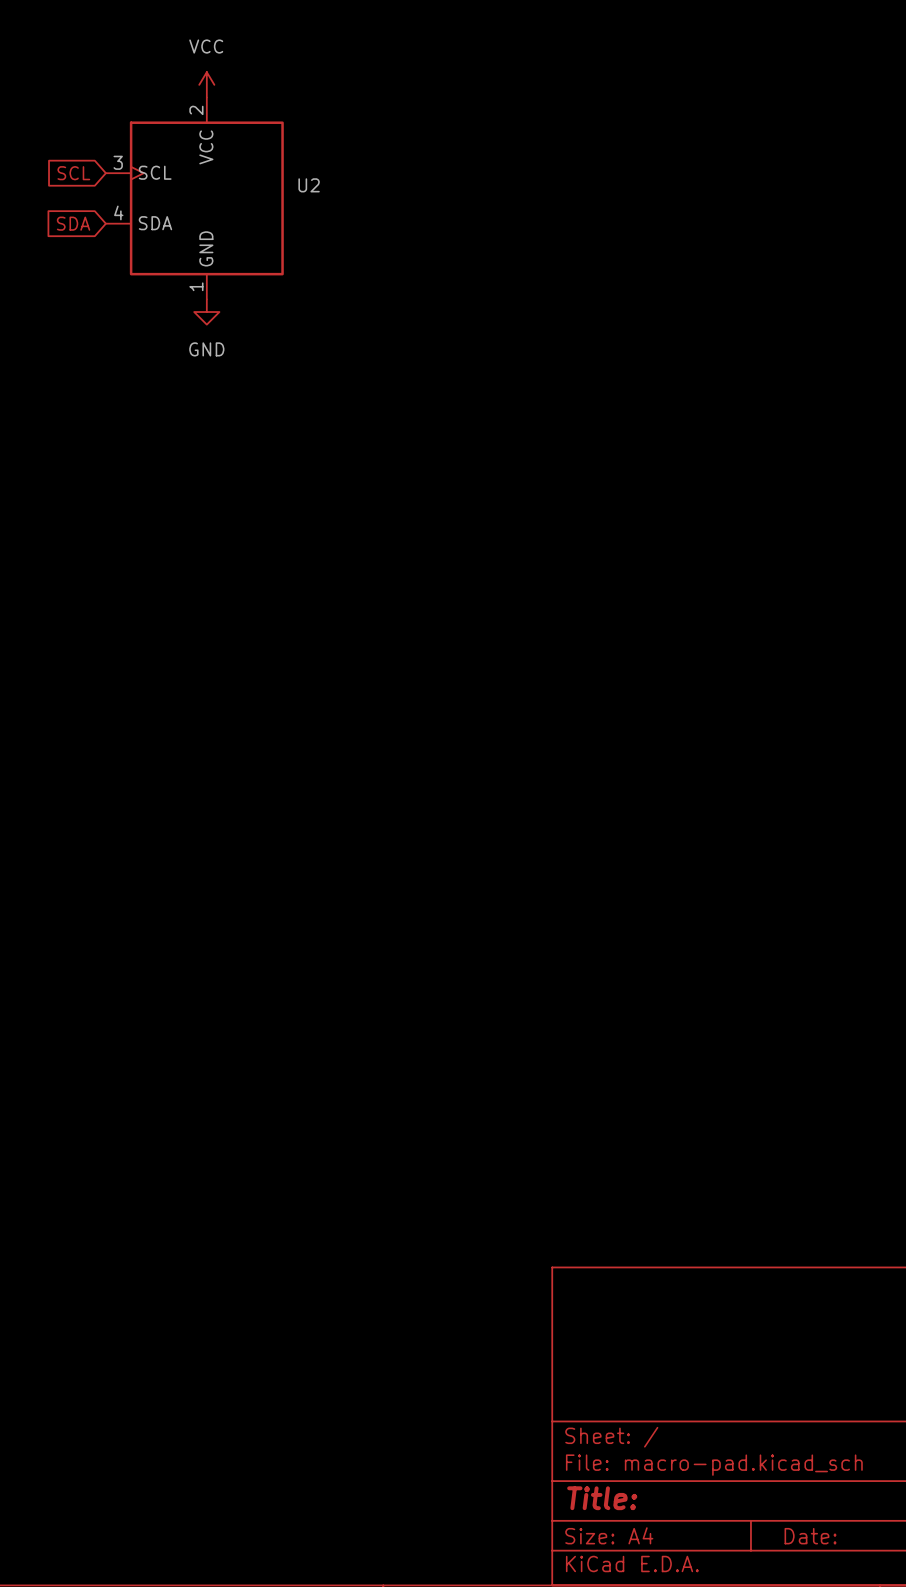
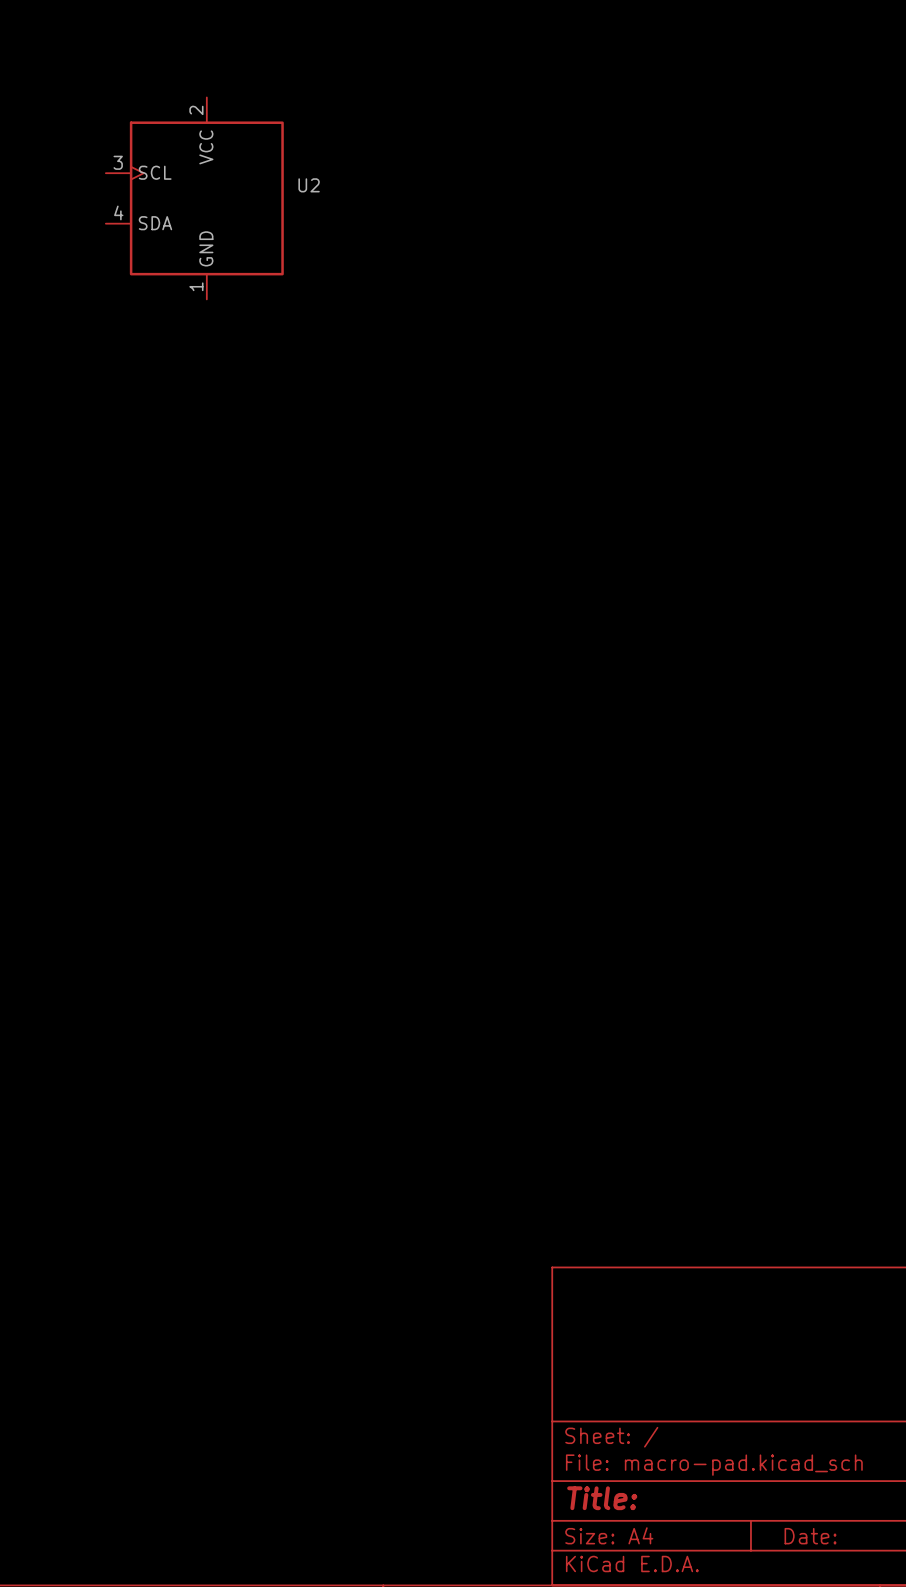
power symbol: VCC (206, 84) -> none
global label: SCL (73, 173) -> none
global label: SDA (73, 223) -> none
power symbol: GND (206, 312) -> none

